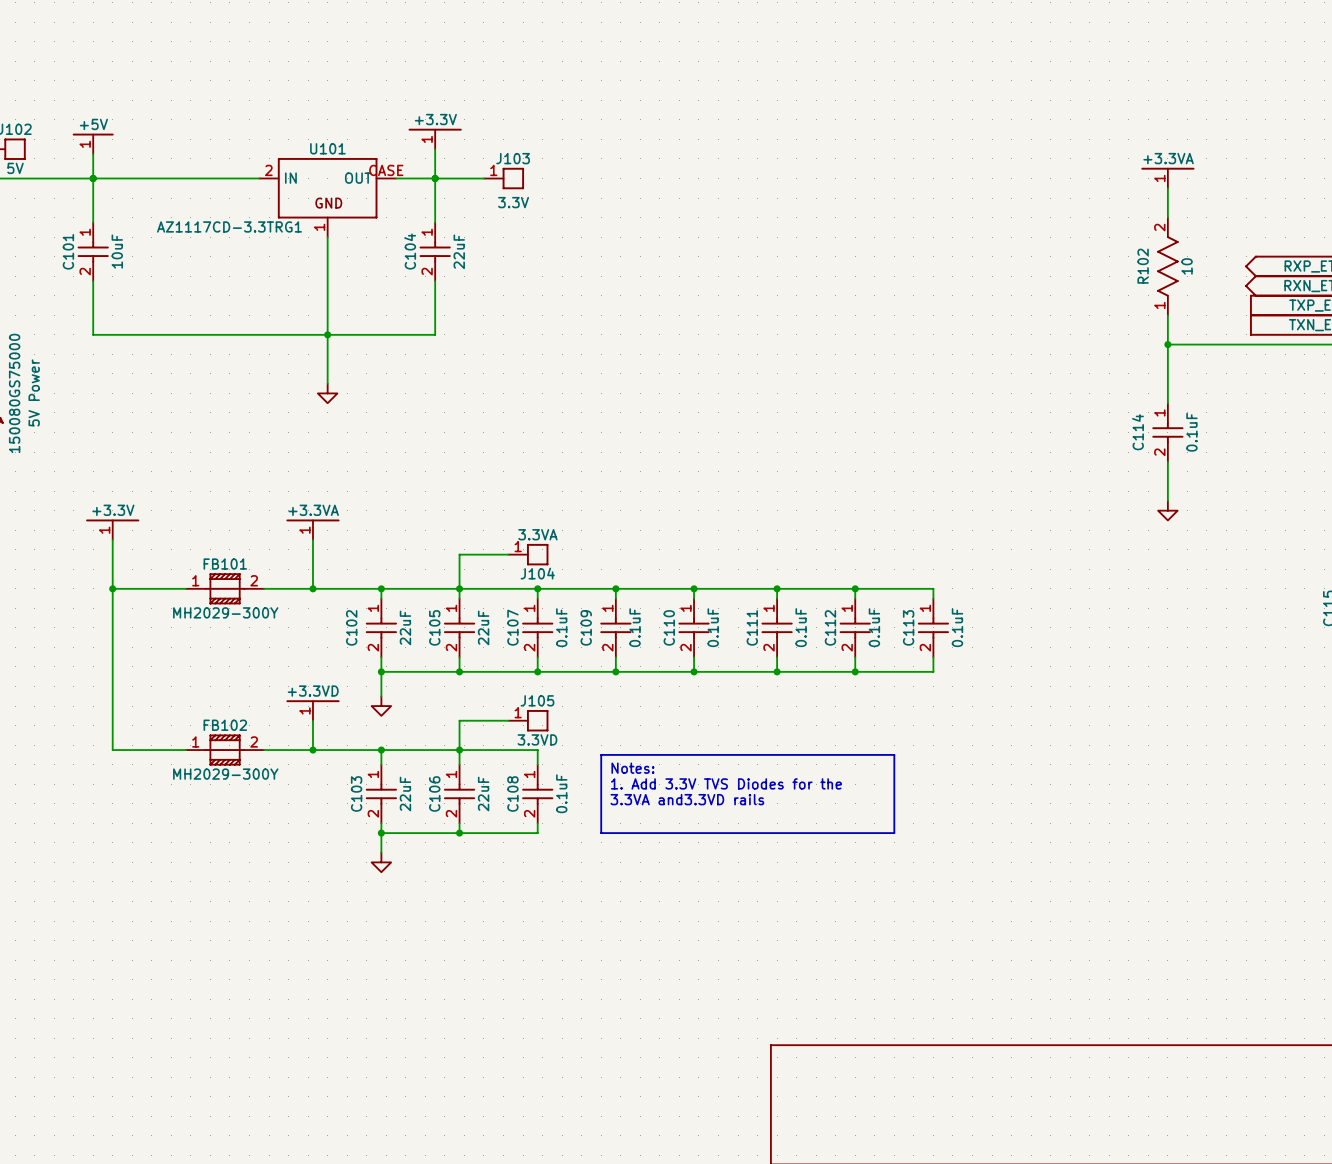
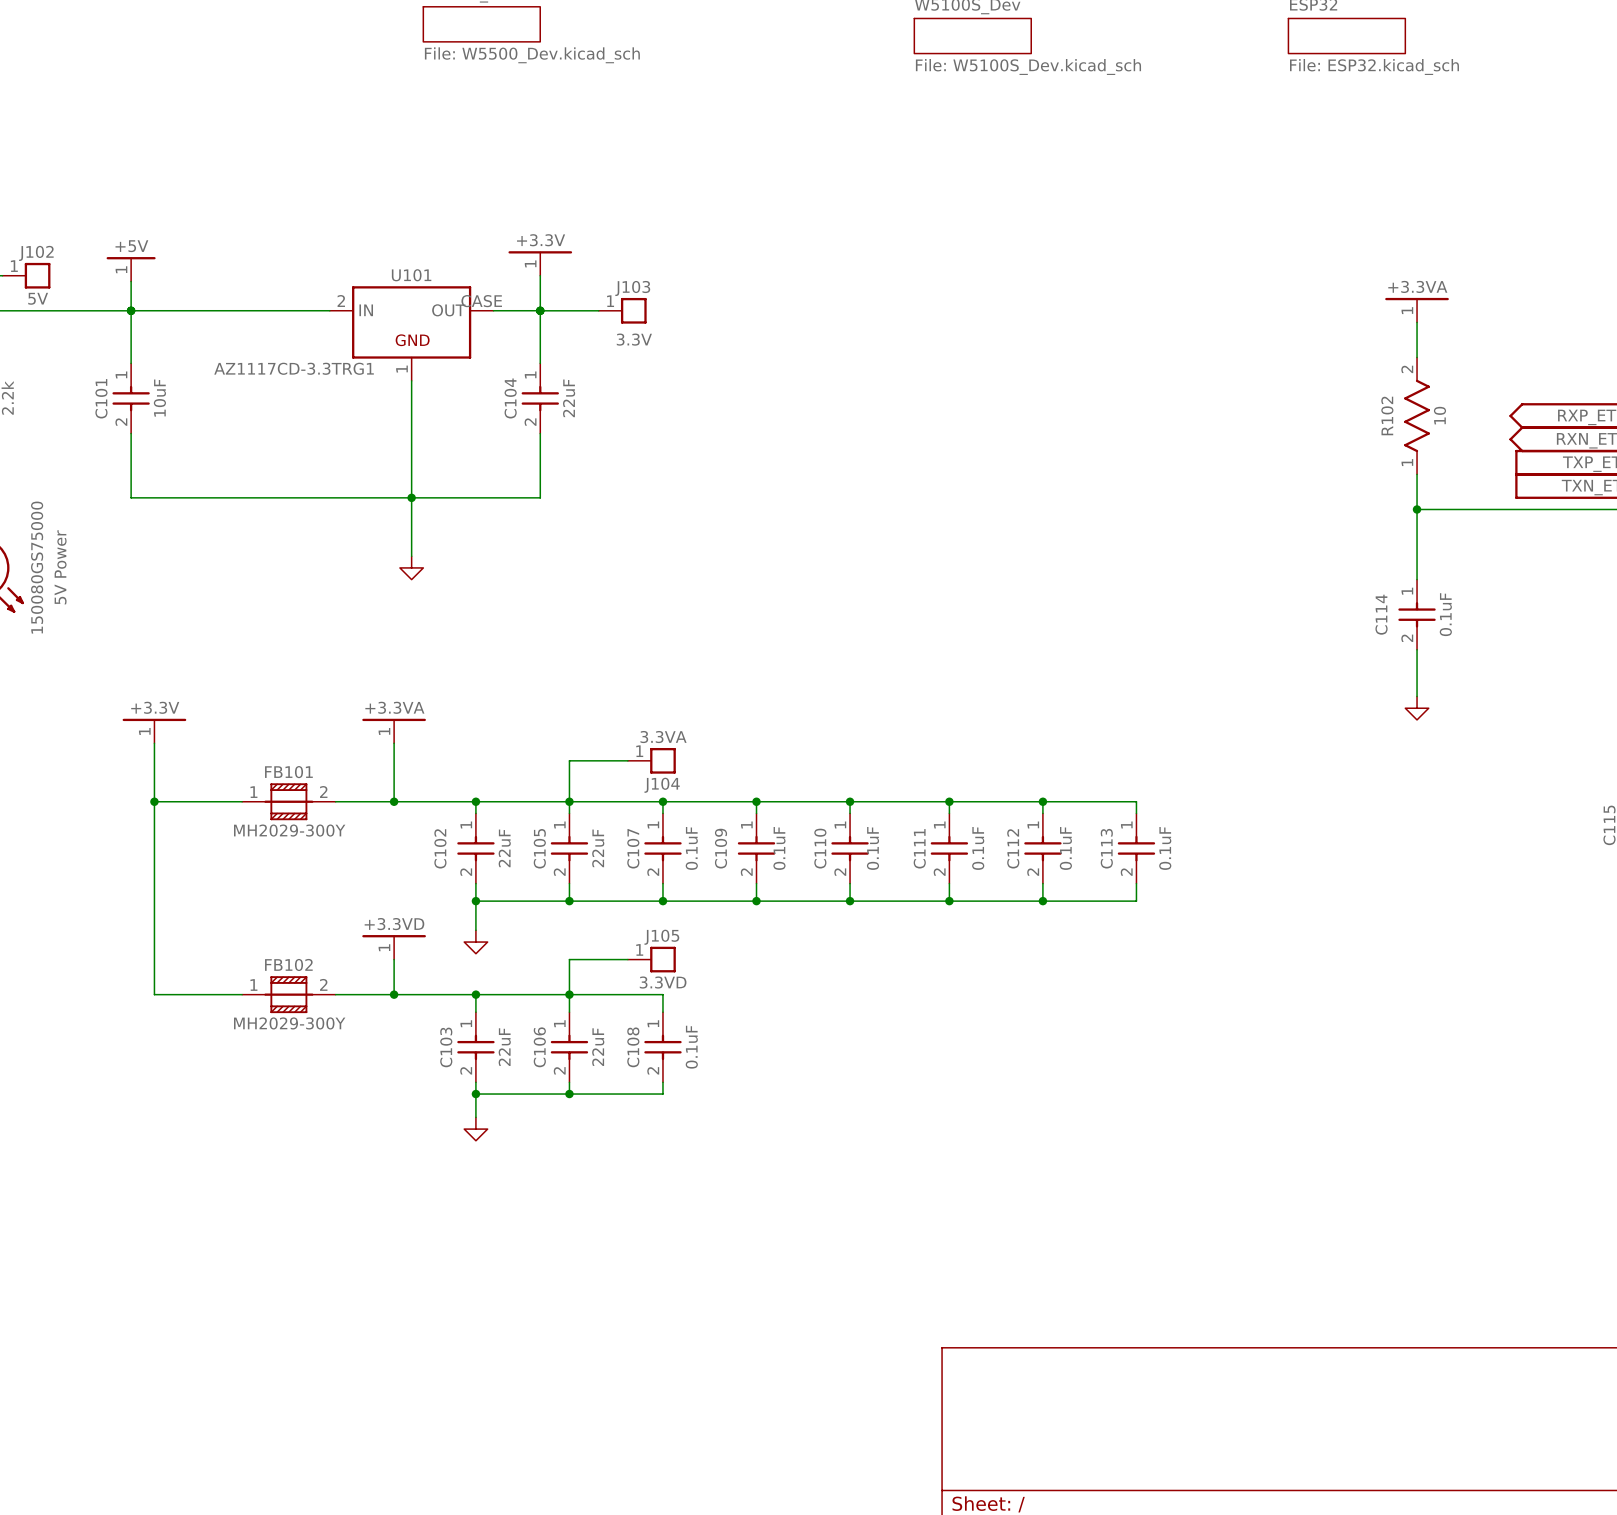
line: (601, 754) (894, 754) (894, 833) (601, 833) (601, 754) -> none
text: Notes: (632, 768) -> none
text: 1. Add 3.3V TVS Diodes for the (726, 783) -> none
text: 3.3VA and3.3VD rails (687, 799) -> none

